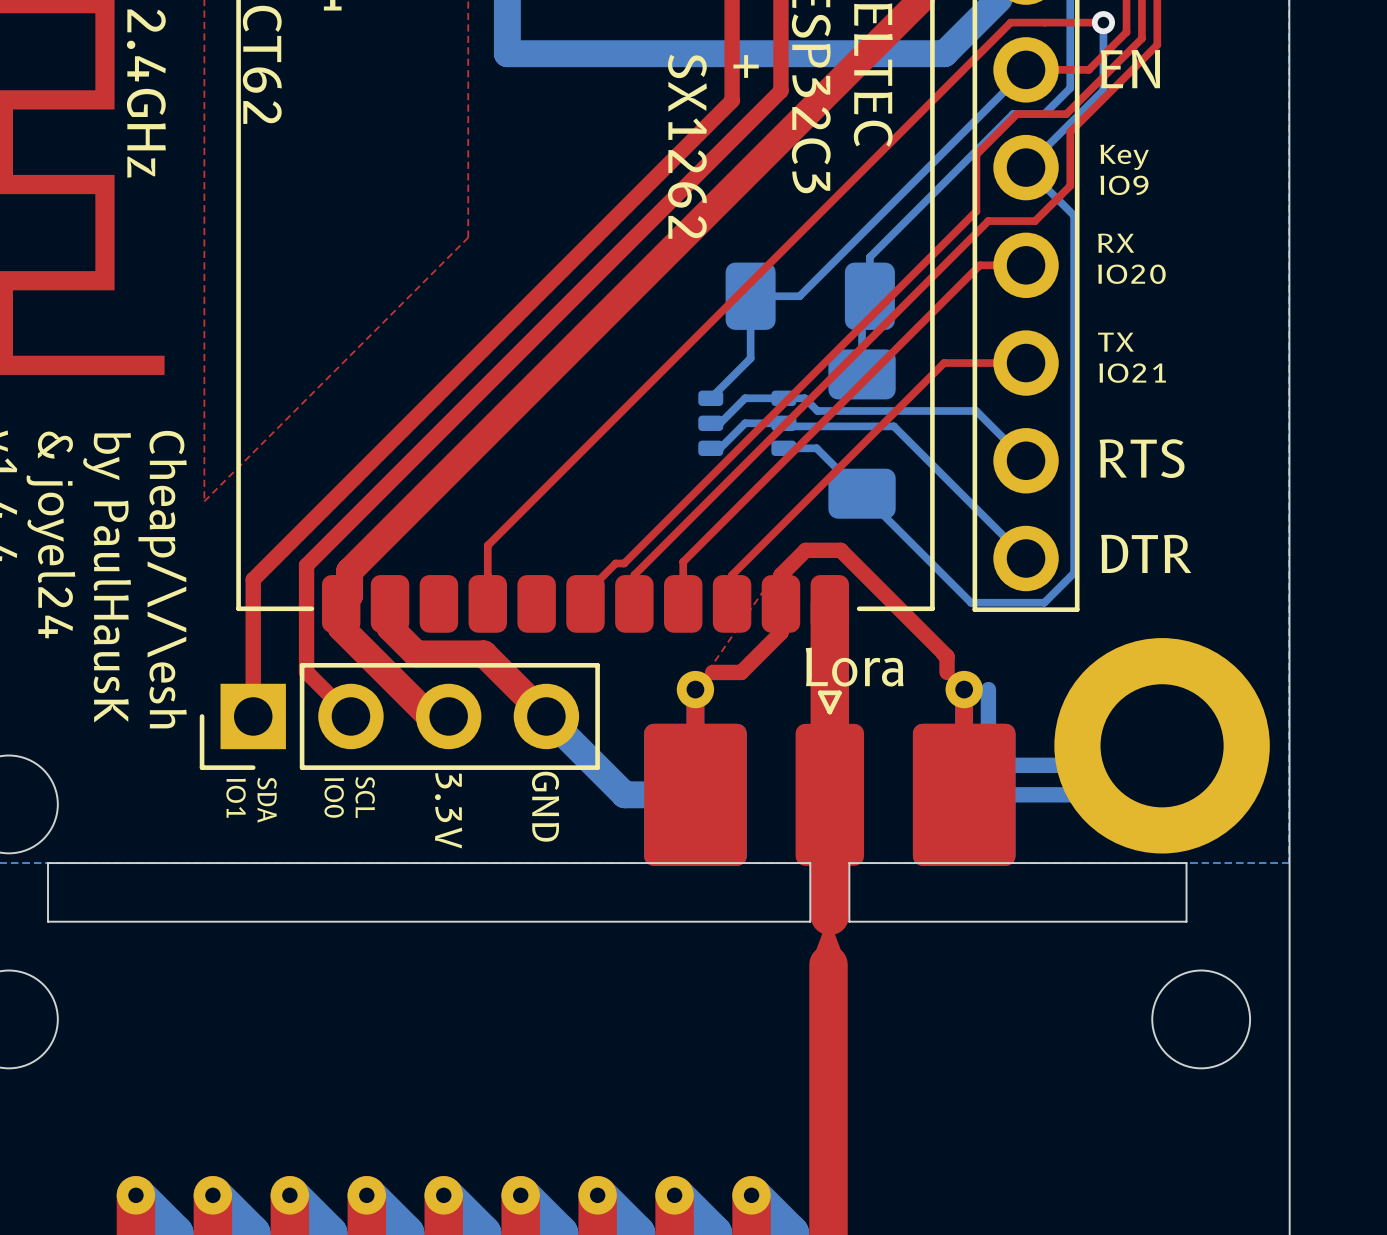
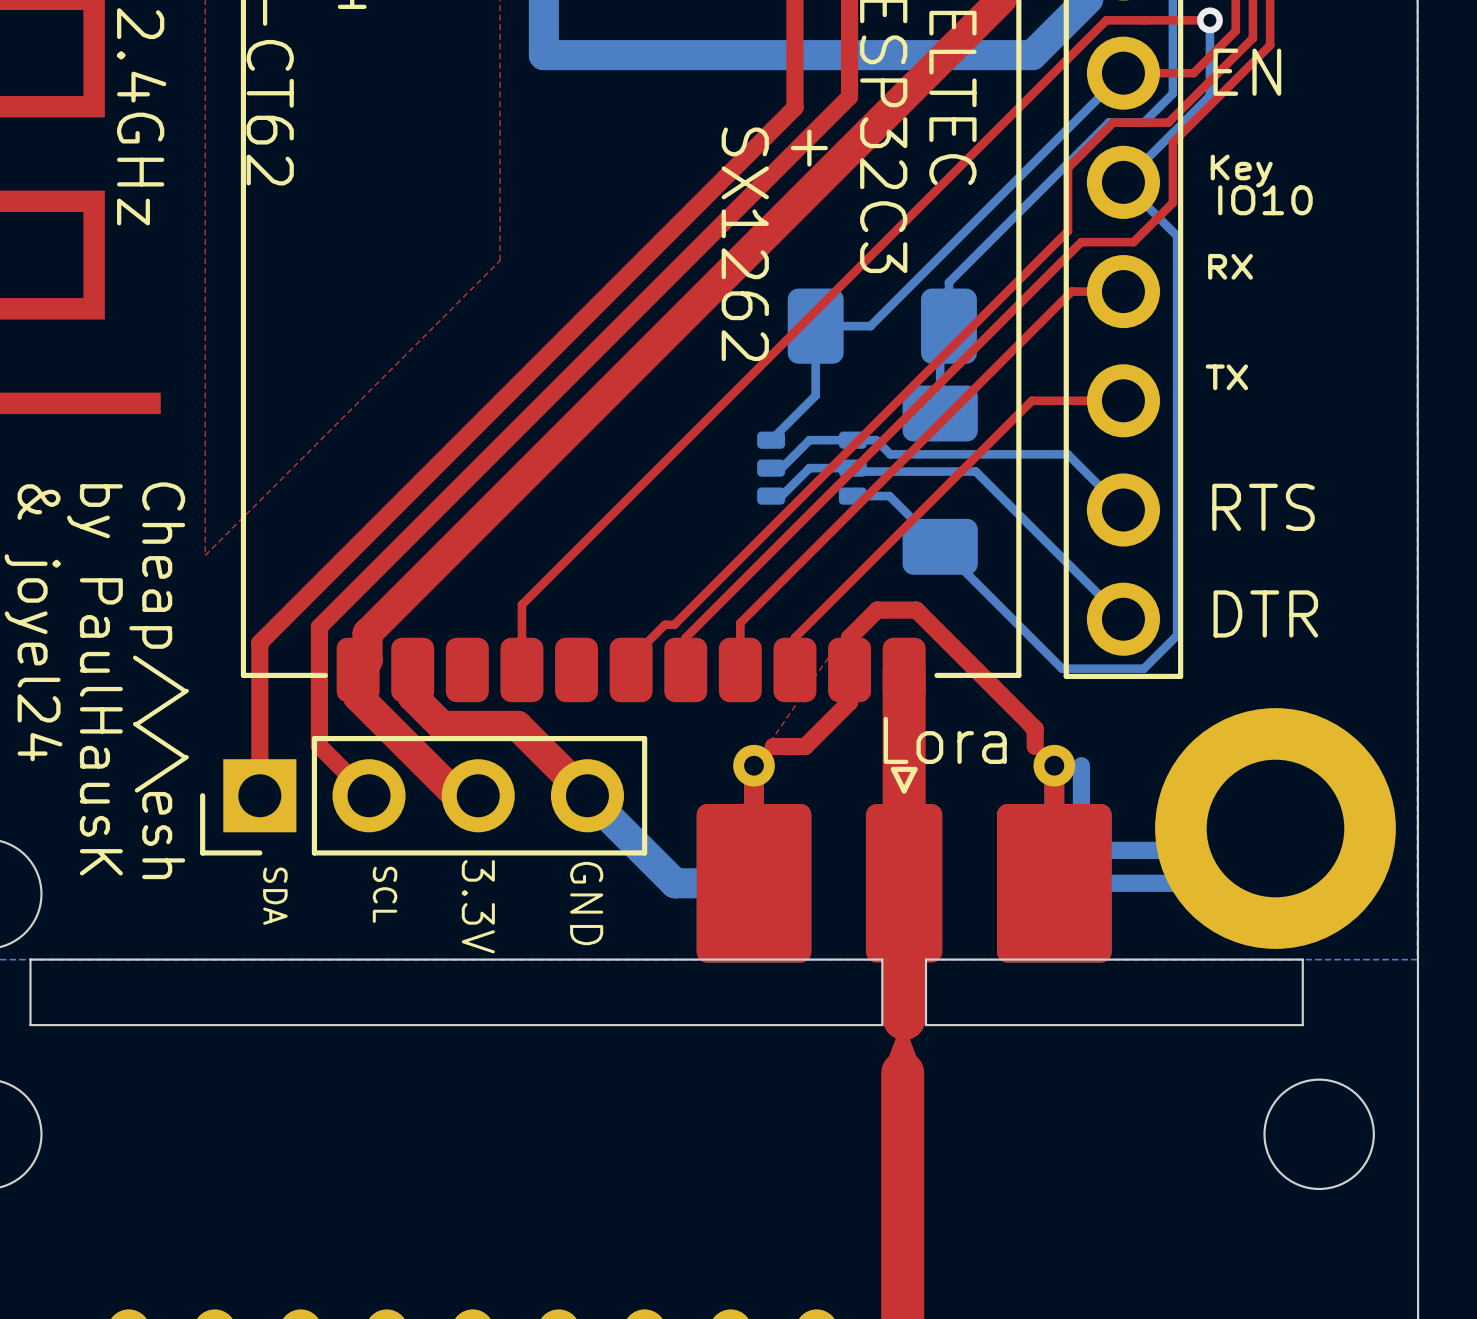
text: IO9 (1124, 185) -> IO10 (1265, 200)
text: IO20 (1131, 274) -> none
text: IO21 (1132, 373) -> none
text: IO0 (334, 797) -> none
text: IO1 (236, 798) -> none

